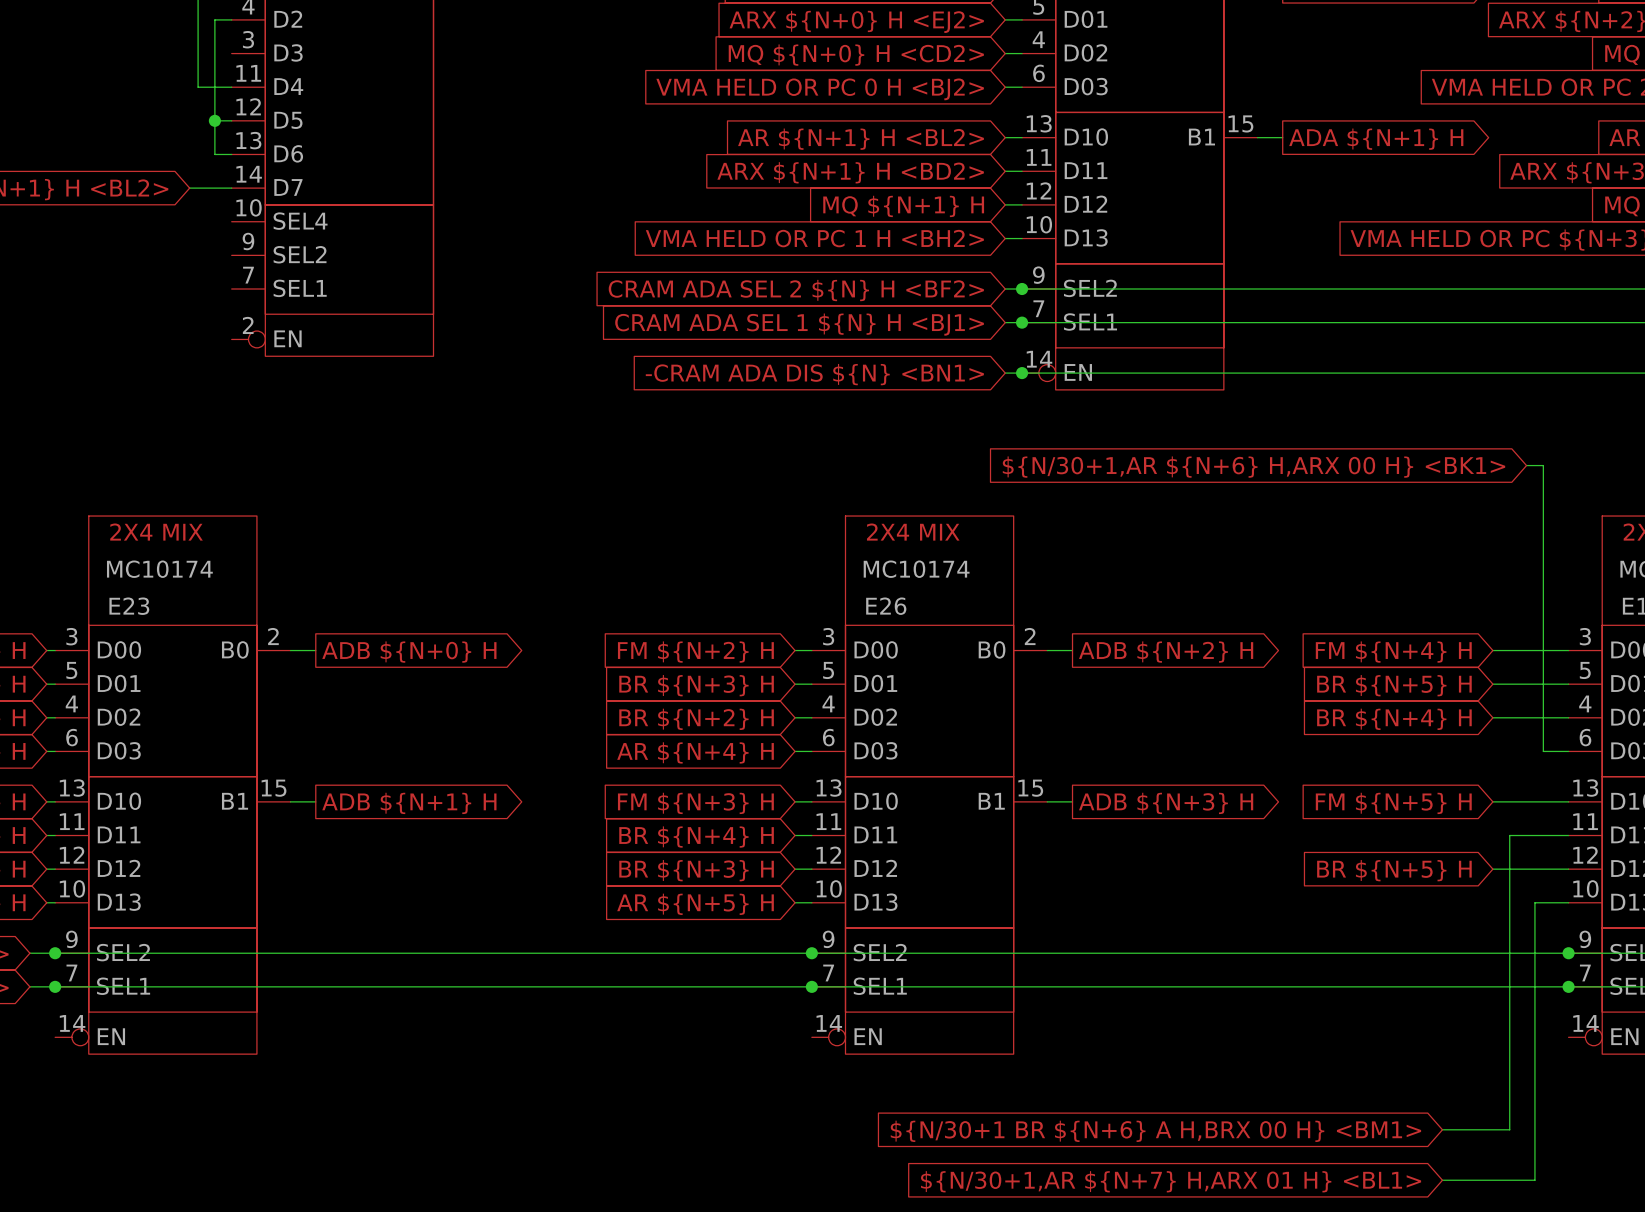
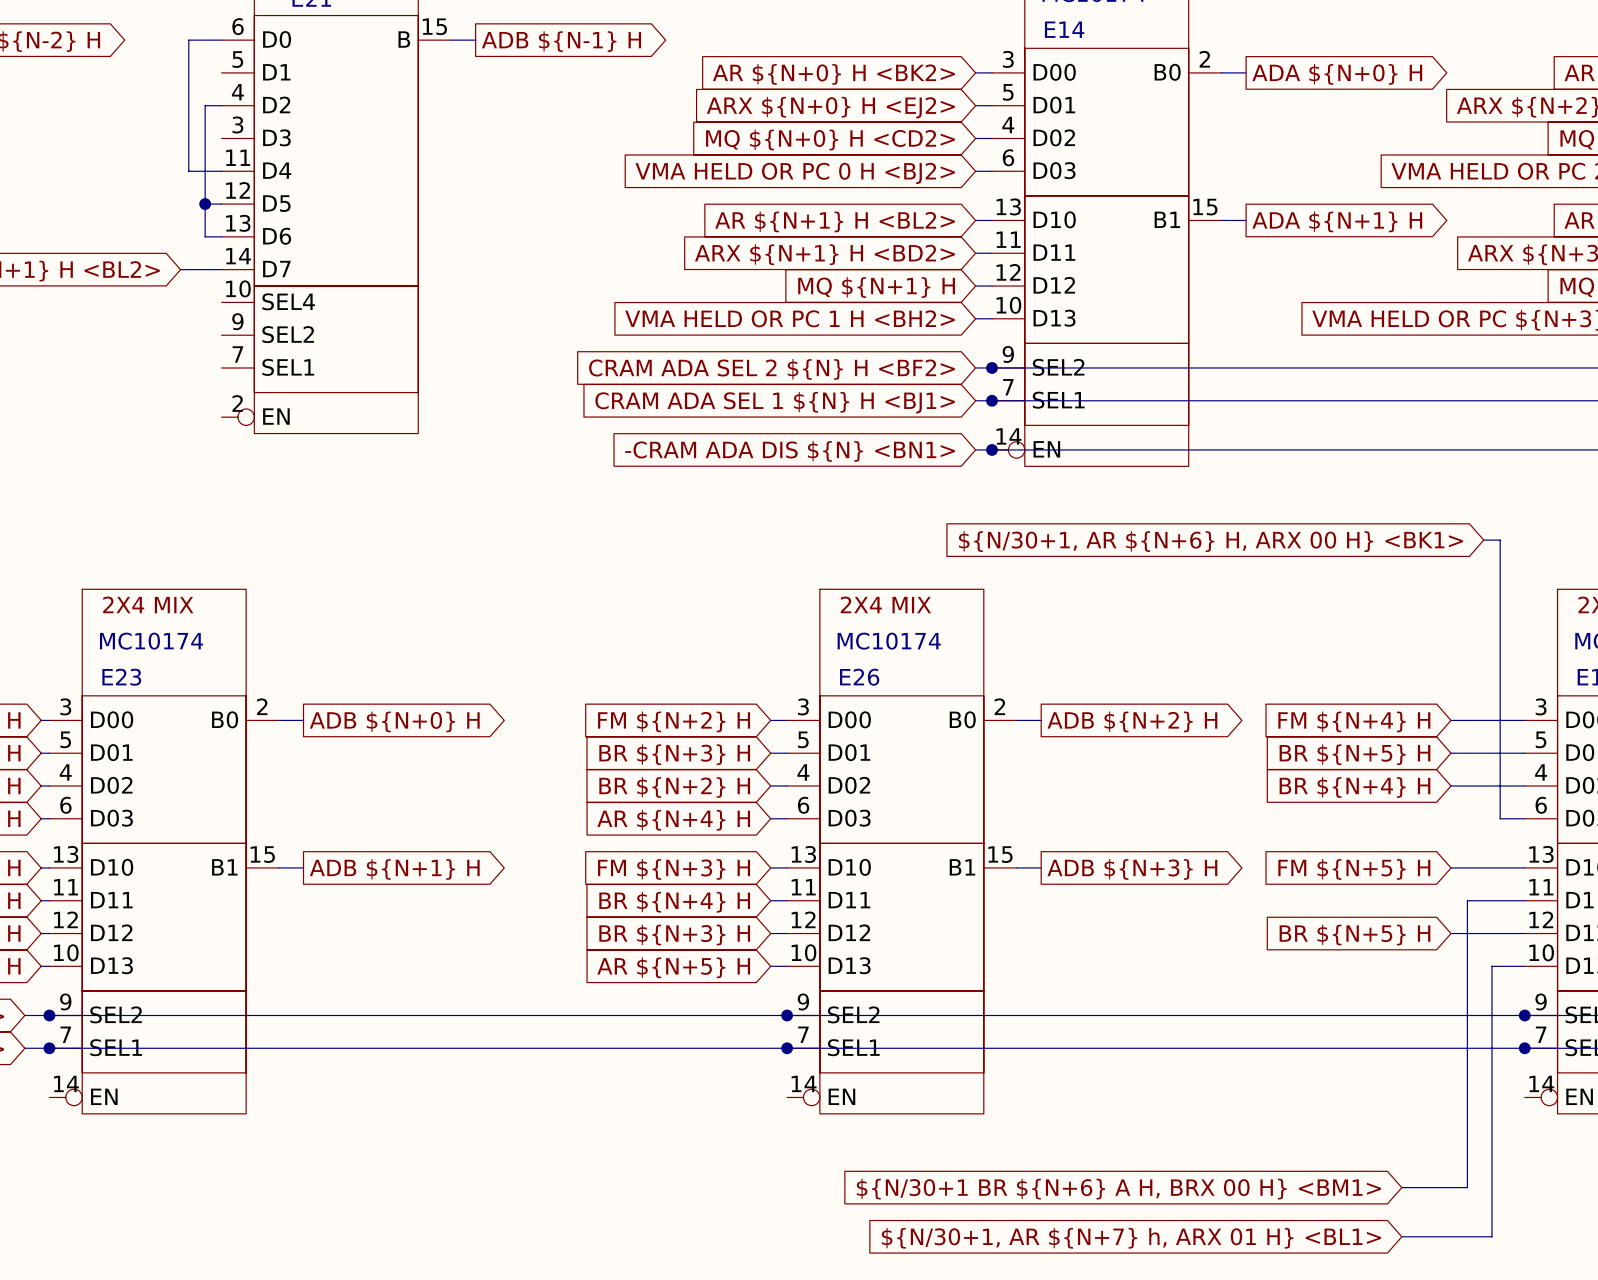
global label: ${N/30+1,AR ${N+6} H,ARX 00 H} <BK1> (1254, 467) -> ${N/30+1, AR ${N+6} H, ARX 00 H} <BK1> (1210, 541)
global label: ${N/30+1 BR ${N+6} A H,BRX 00 H} <BM1> (1155, 1131) -> ${N/30+1 BR ${N+6} A H, BRX 00 H} <BM1> (1118, 1189)
global label: ${N/30+1,AR ${N+7} H,ARX 01 H} <BL1> (1171, 1181) -> ${N/30+1, AR ${N+7} h, ARX 01 H} <BL1> (1131, 1238)

